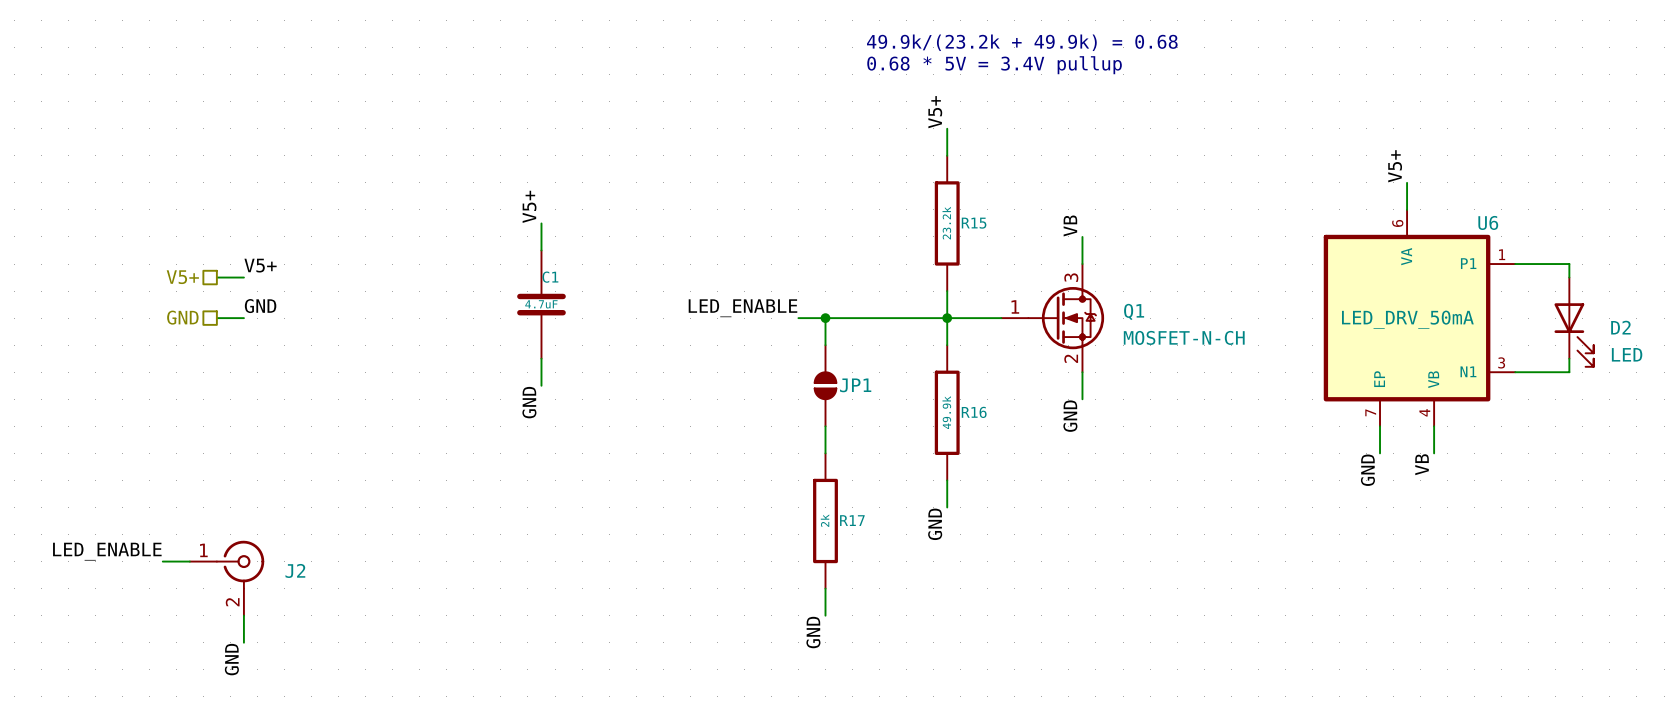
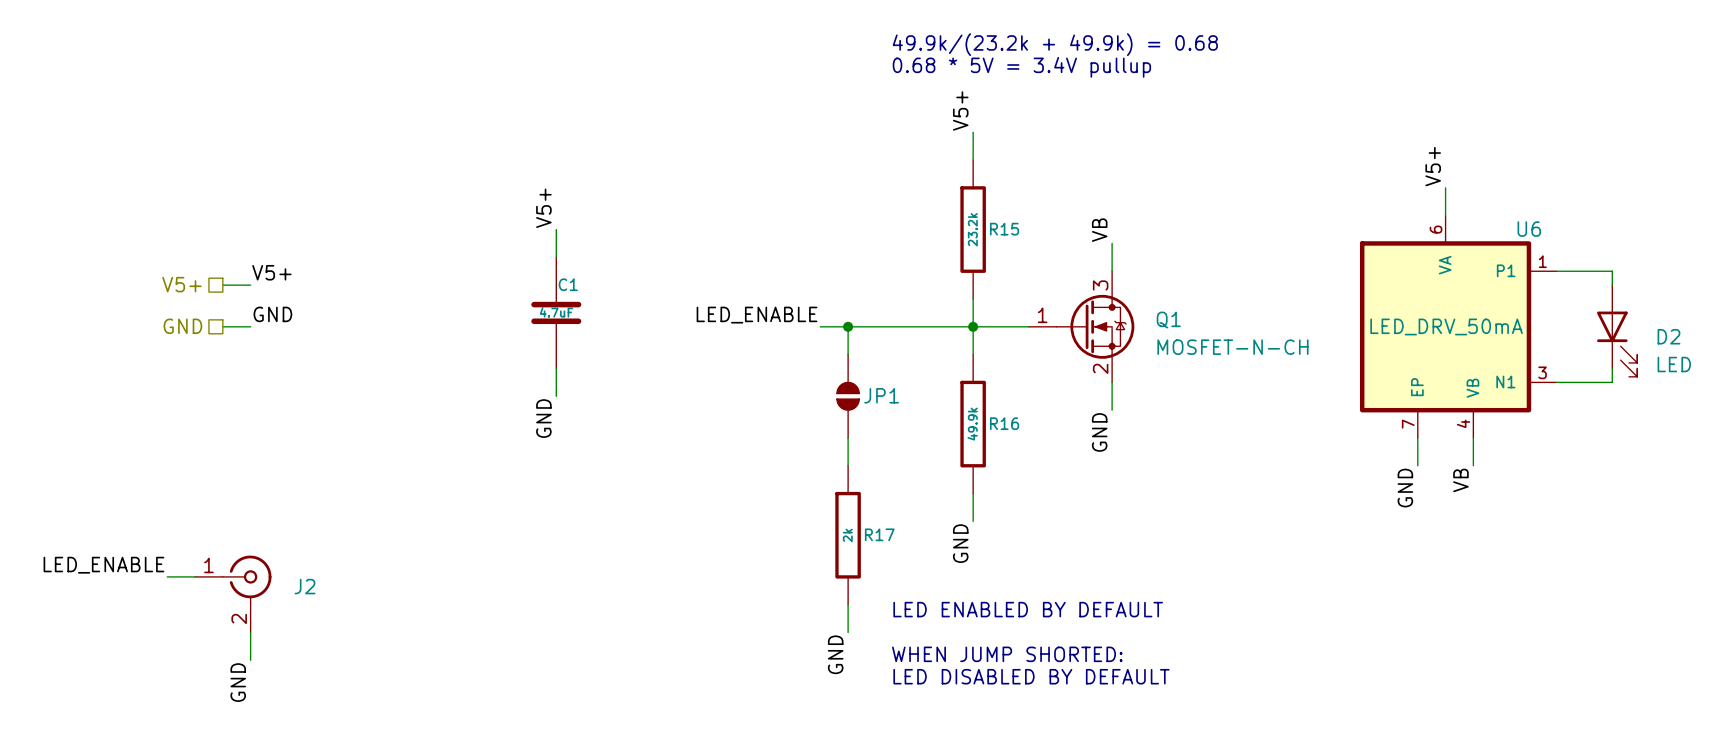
text: none -> LED ENABLED BY DEFAULT (1028, 609)
text: none -> WHEN JUMP SHORTED: (1007, 654)
text: none -> LED DISABLED BY DEFAULT (1031, 676)

